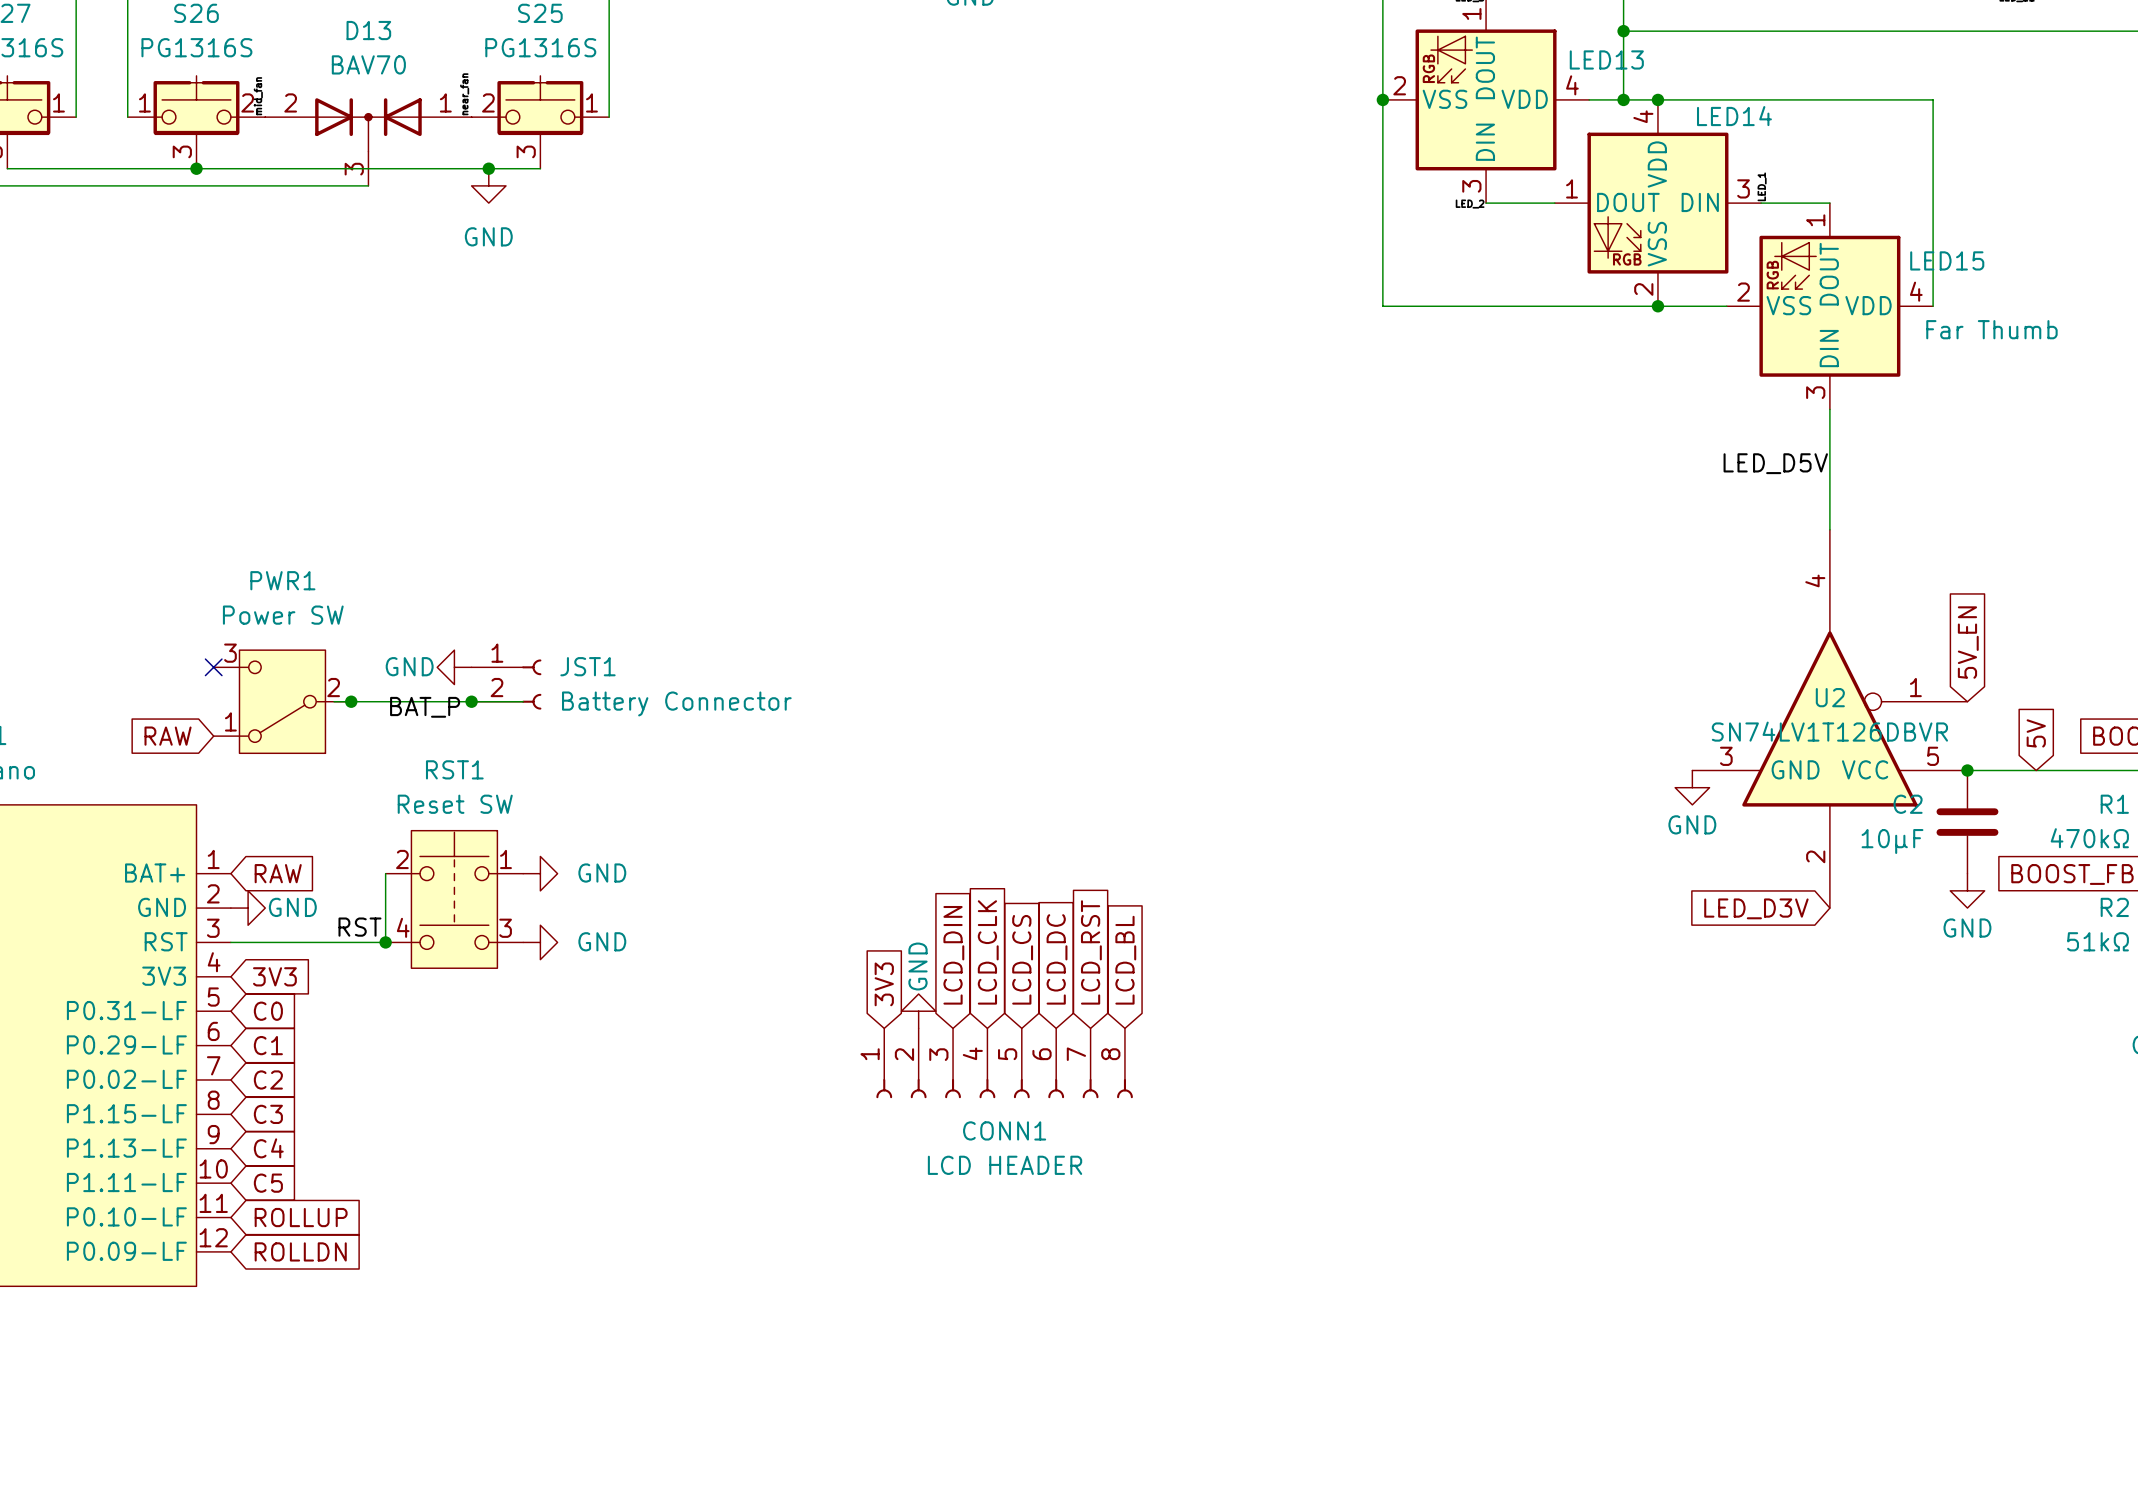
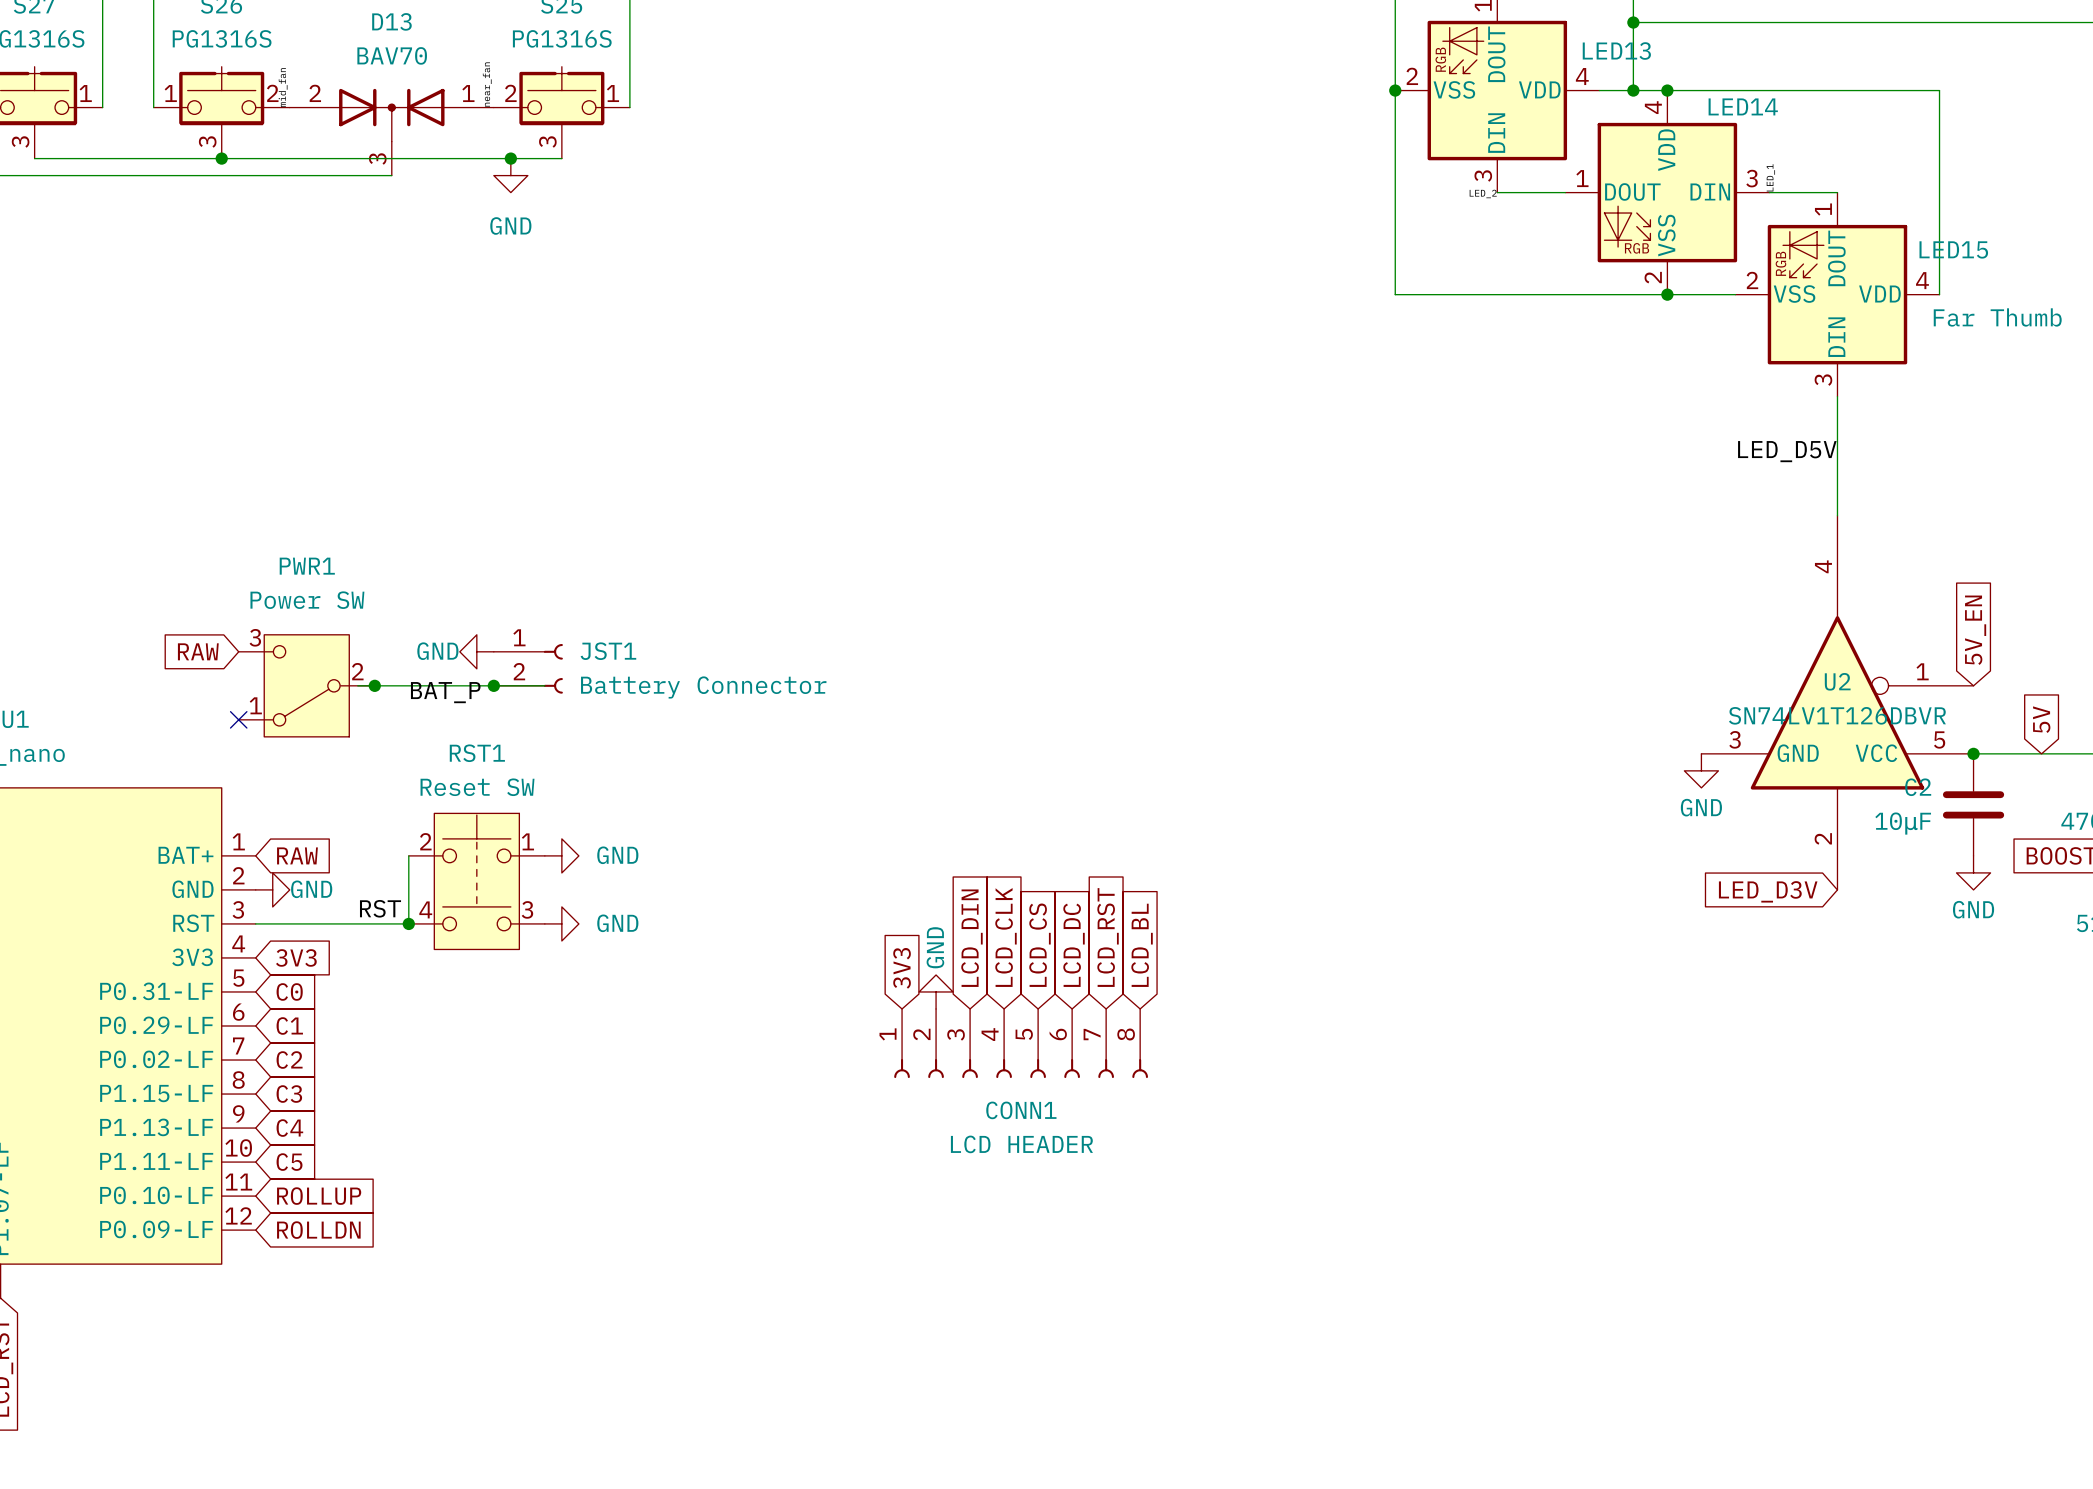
no-connect mark position: (213, 667) -> (238, 719)
global label position: RAW (168, 736) -> RAW (198, 651)

